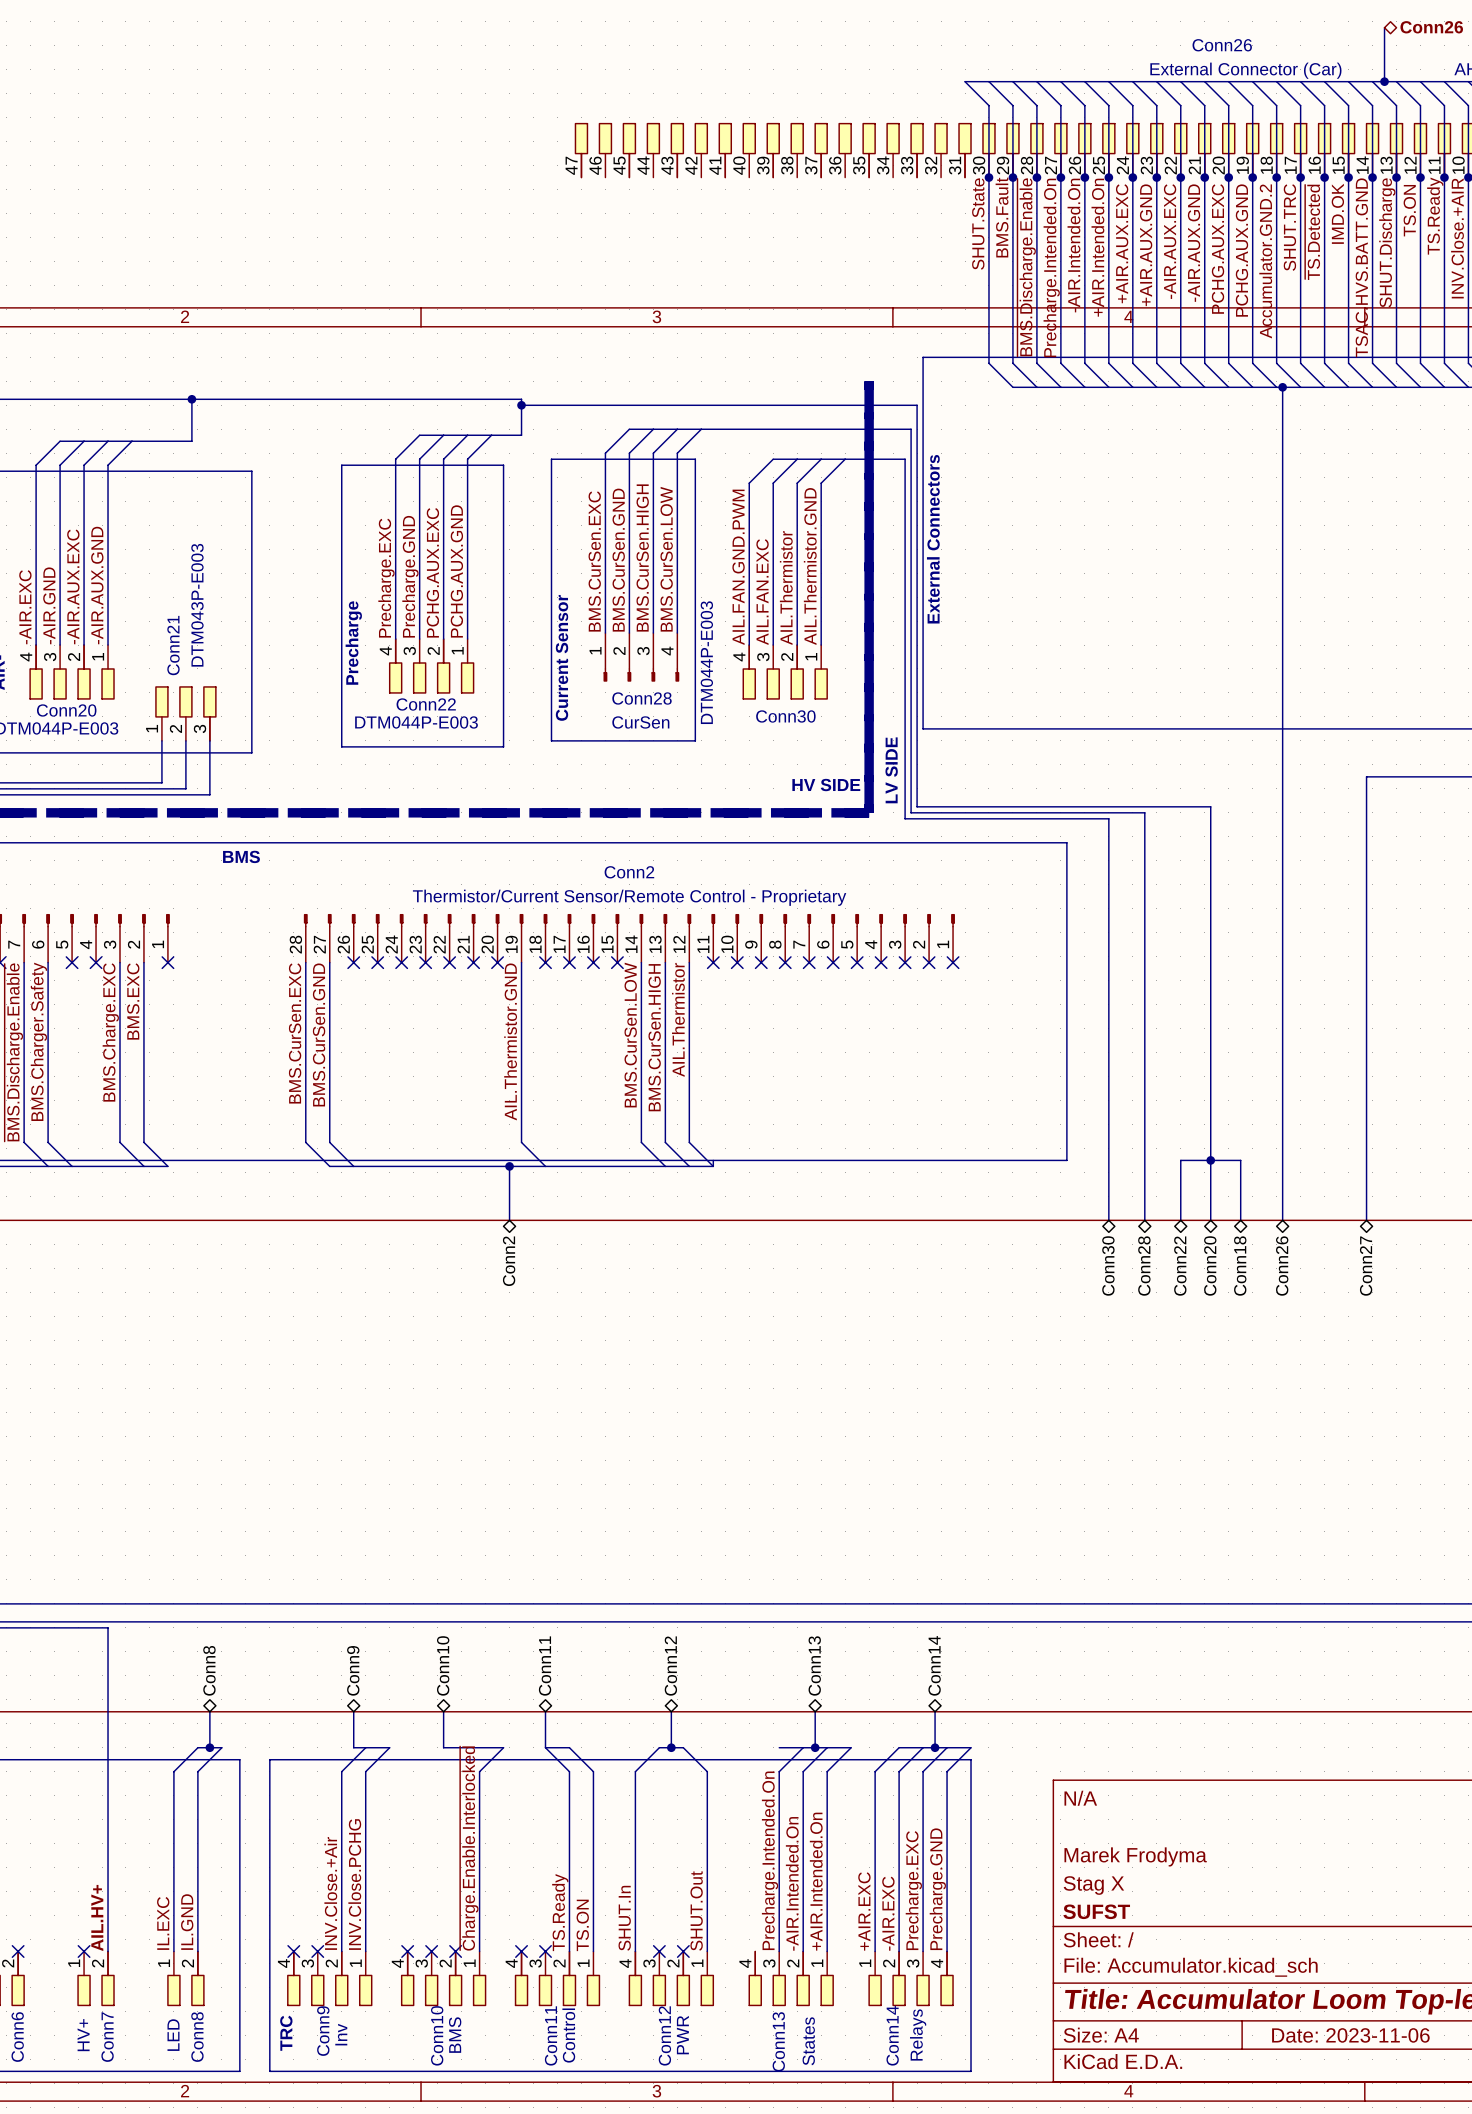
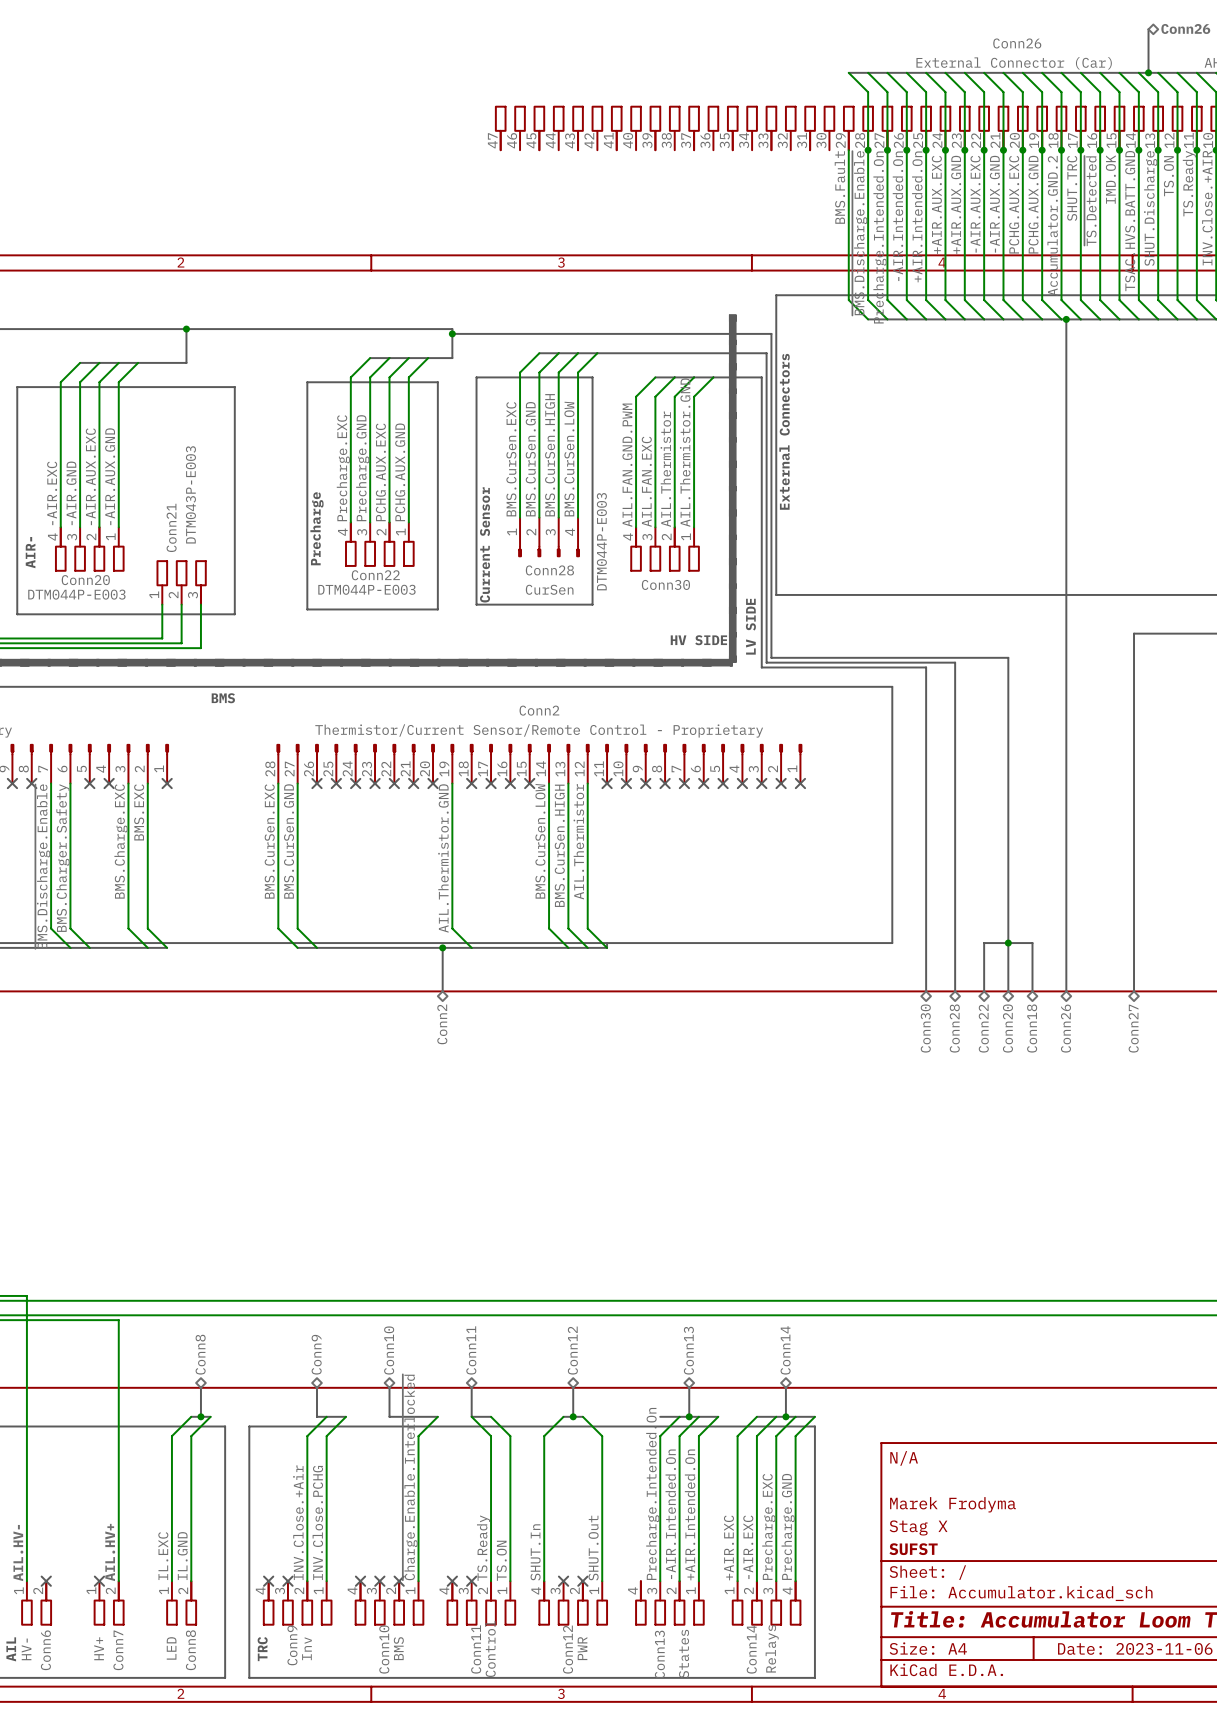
wire: (965, 81) (988, 105) (988, 363) (1012, 387) -> none
bus: (965, 81) (1012, 81) -> none
wire: (988, 81) (1012, 105) (1012, 177) -> none
junction: (988, 177) -> none
junction: (1012, 177) -> none
label: SHUT.State (978, 224) -> none
bus: (1012, 387) (1036, 387) -> none

